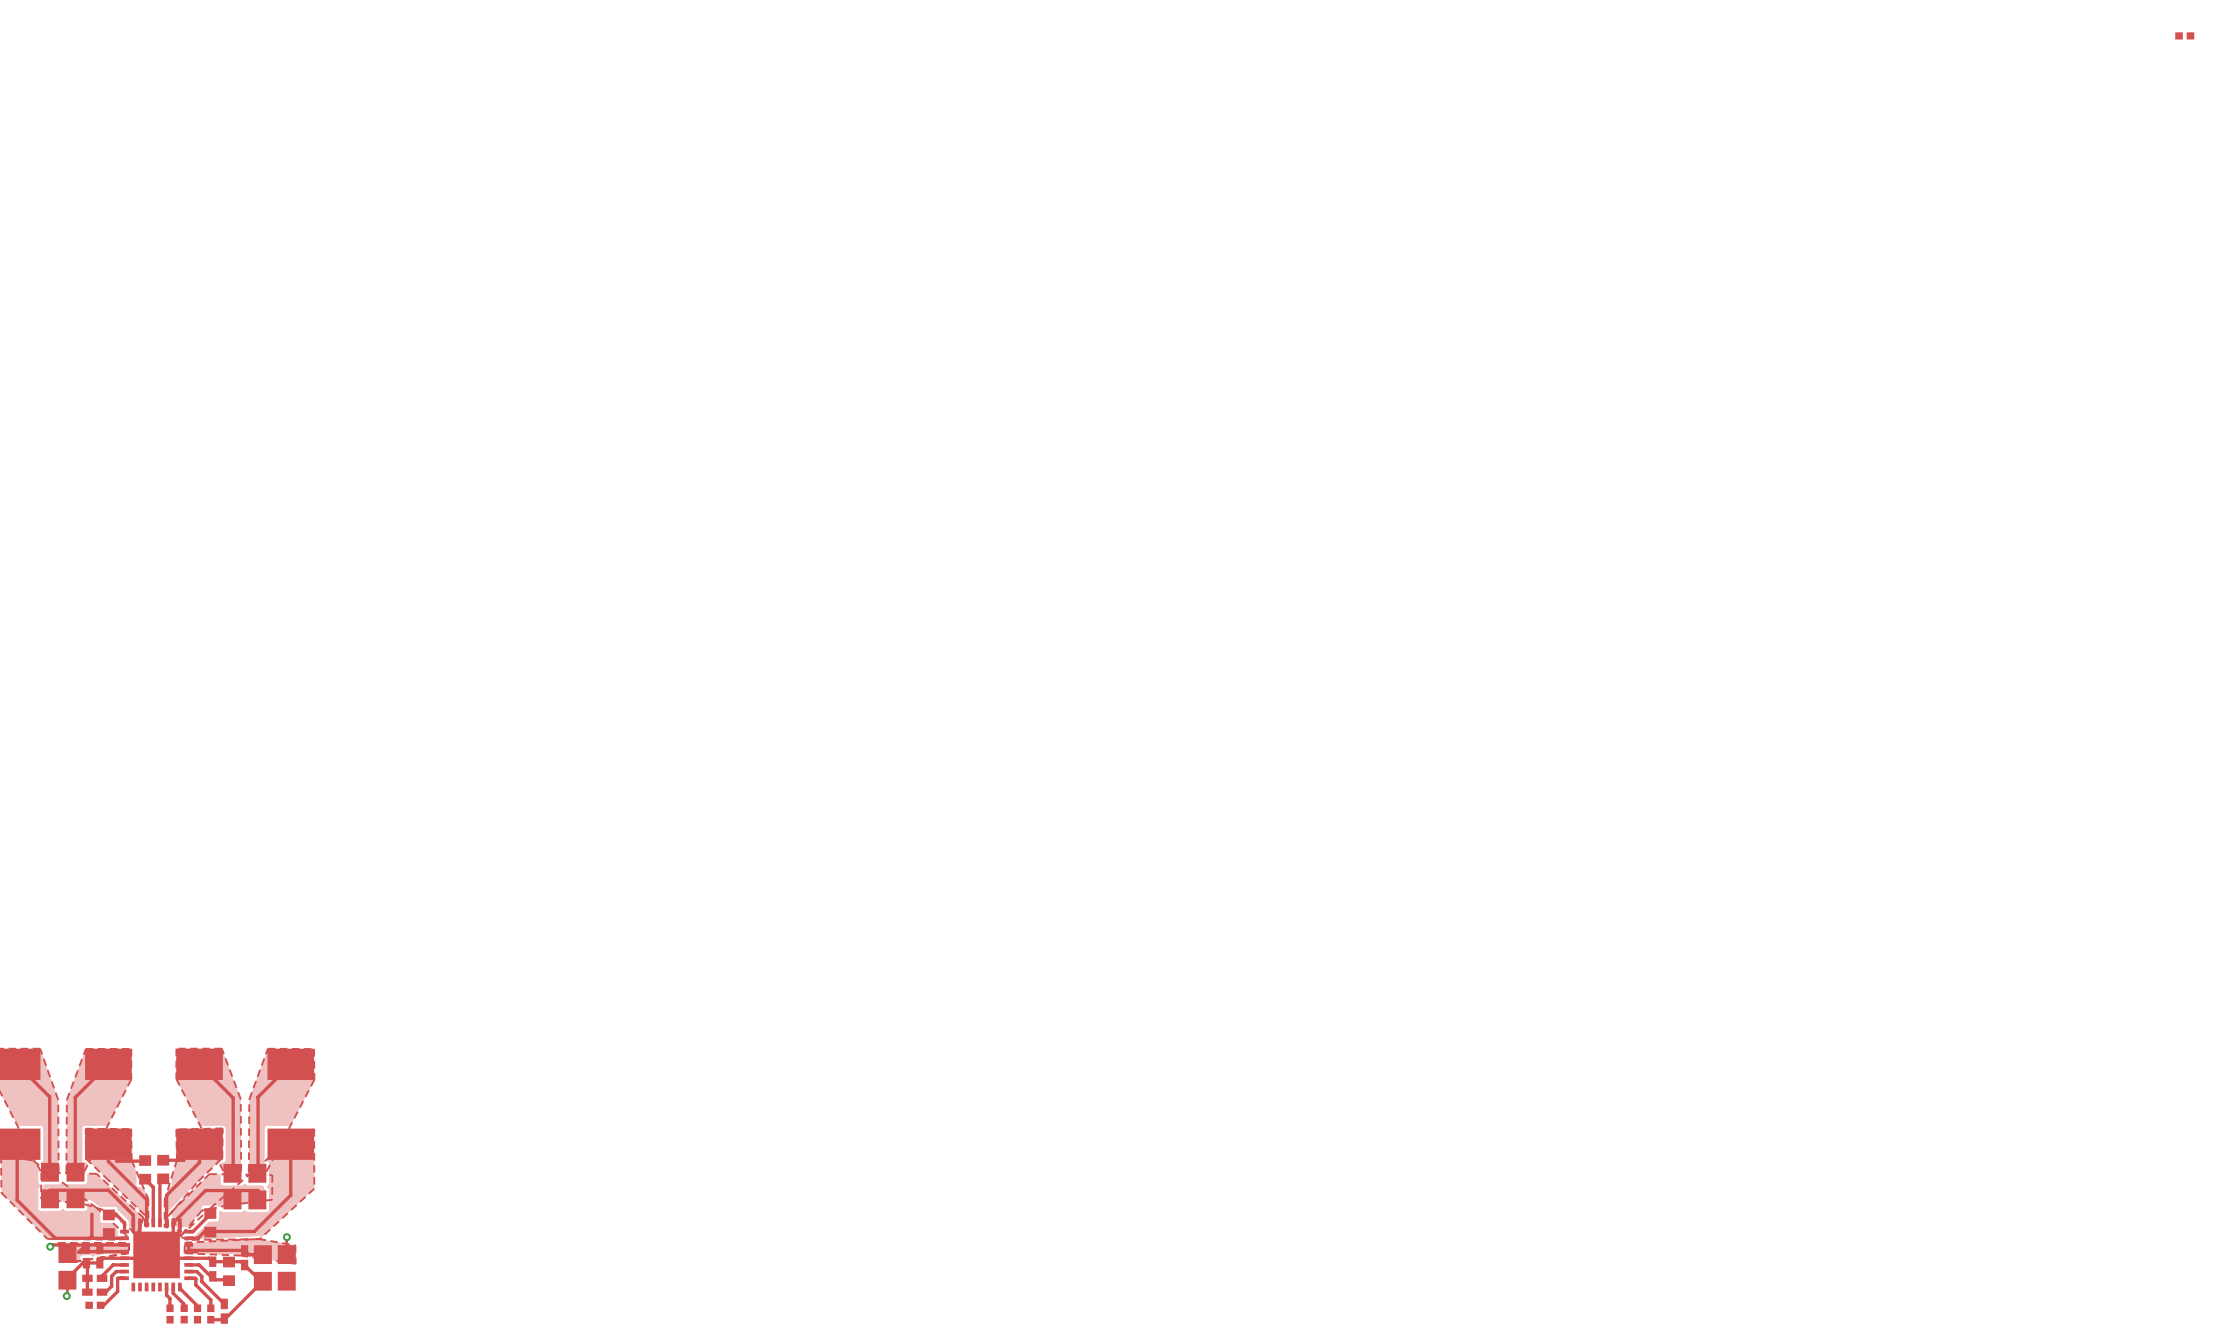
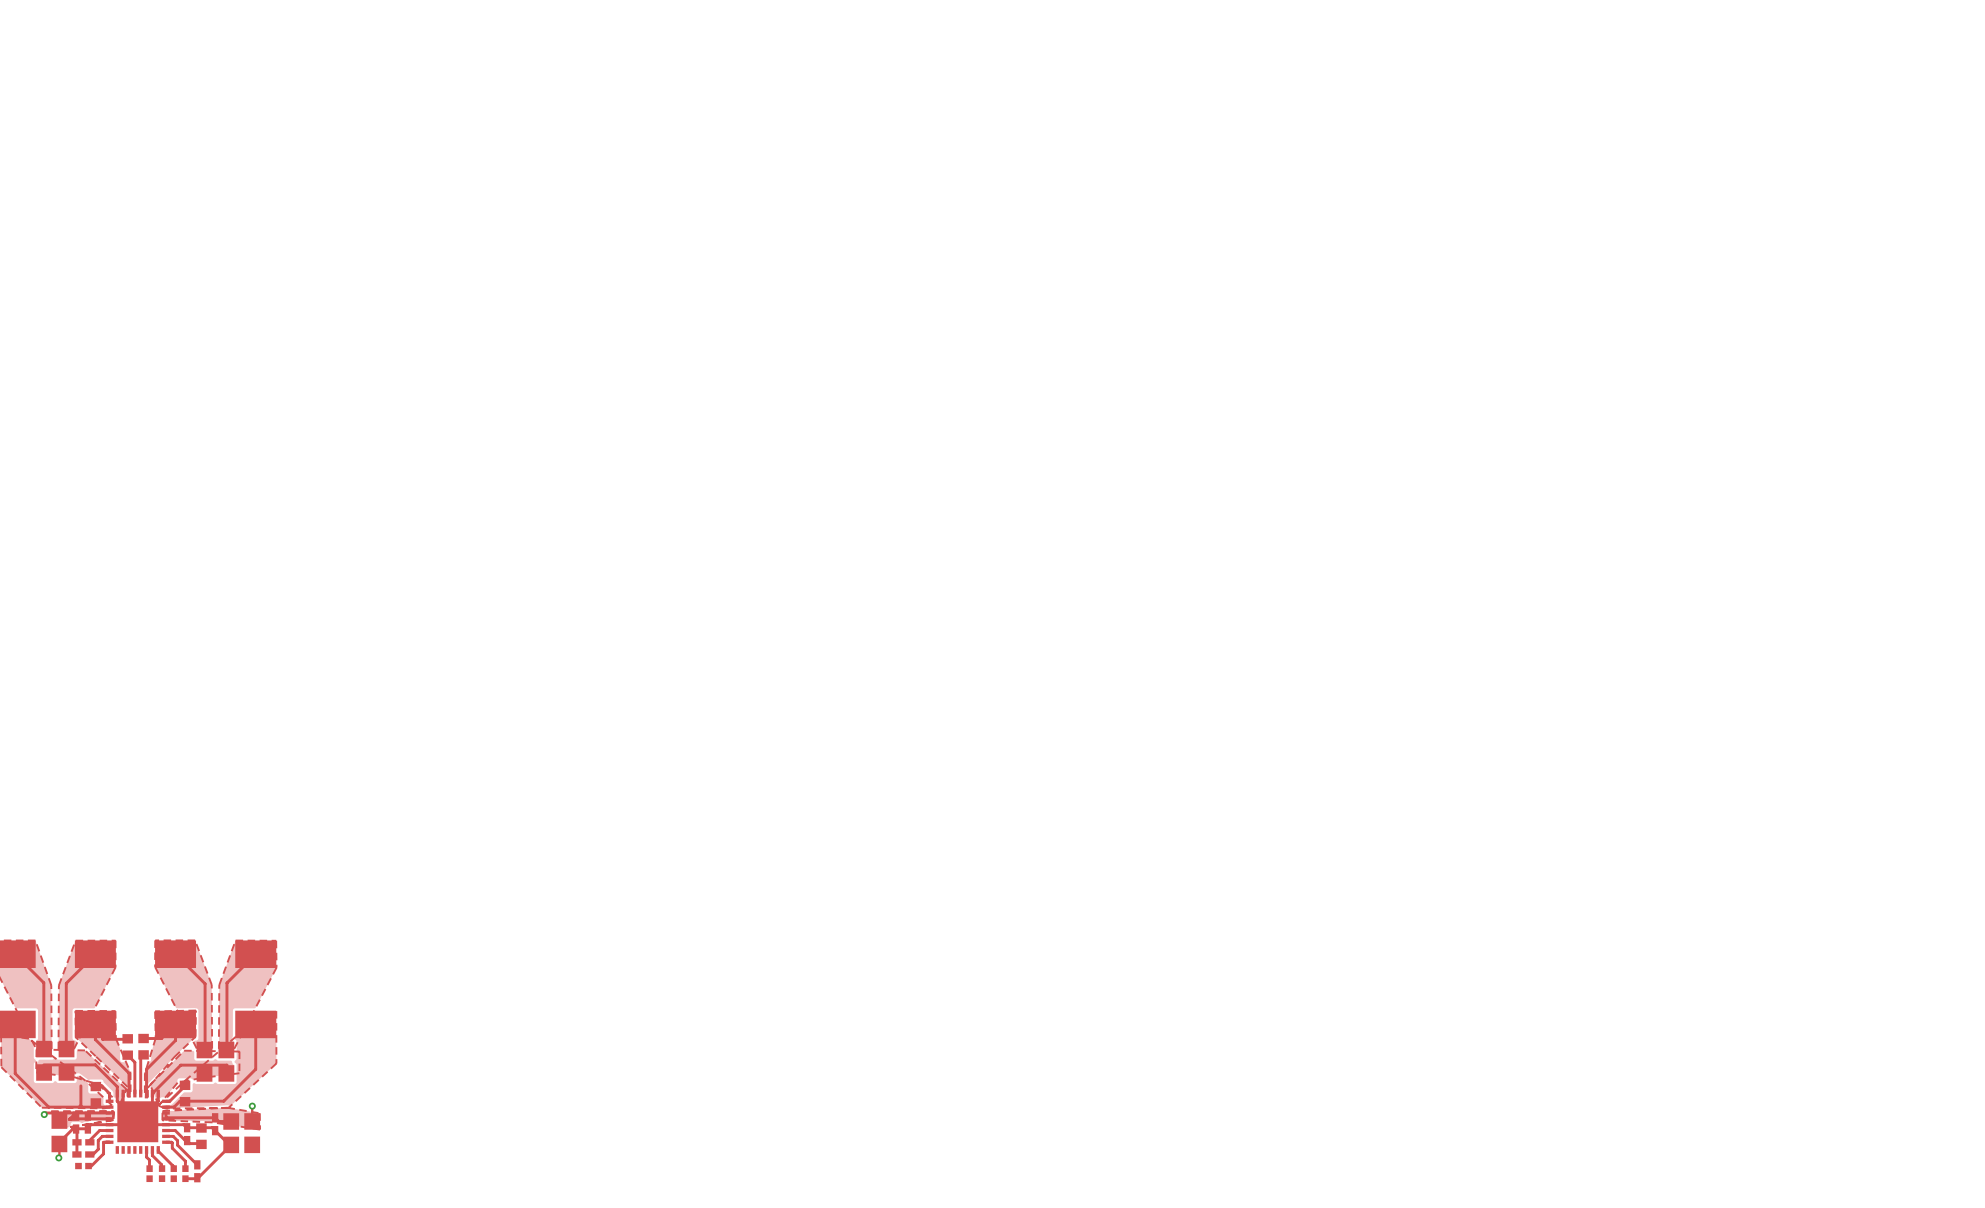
part: (2184, 35) -> none

